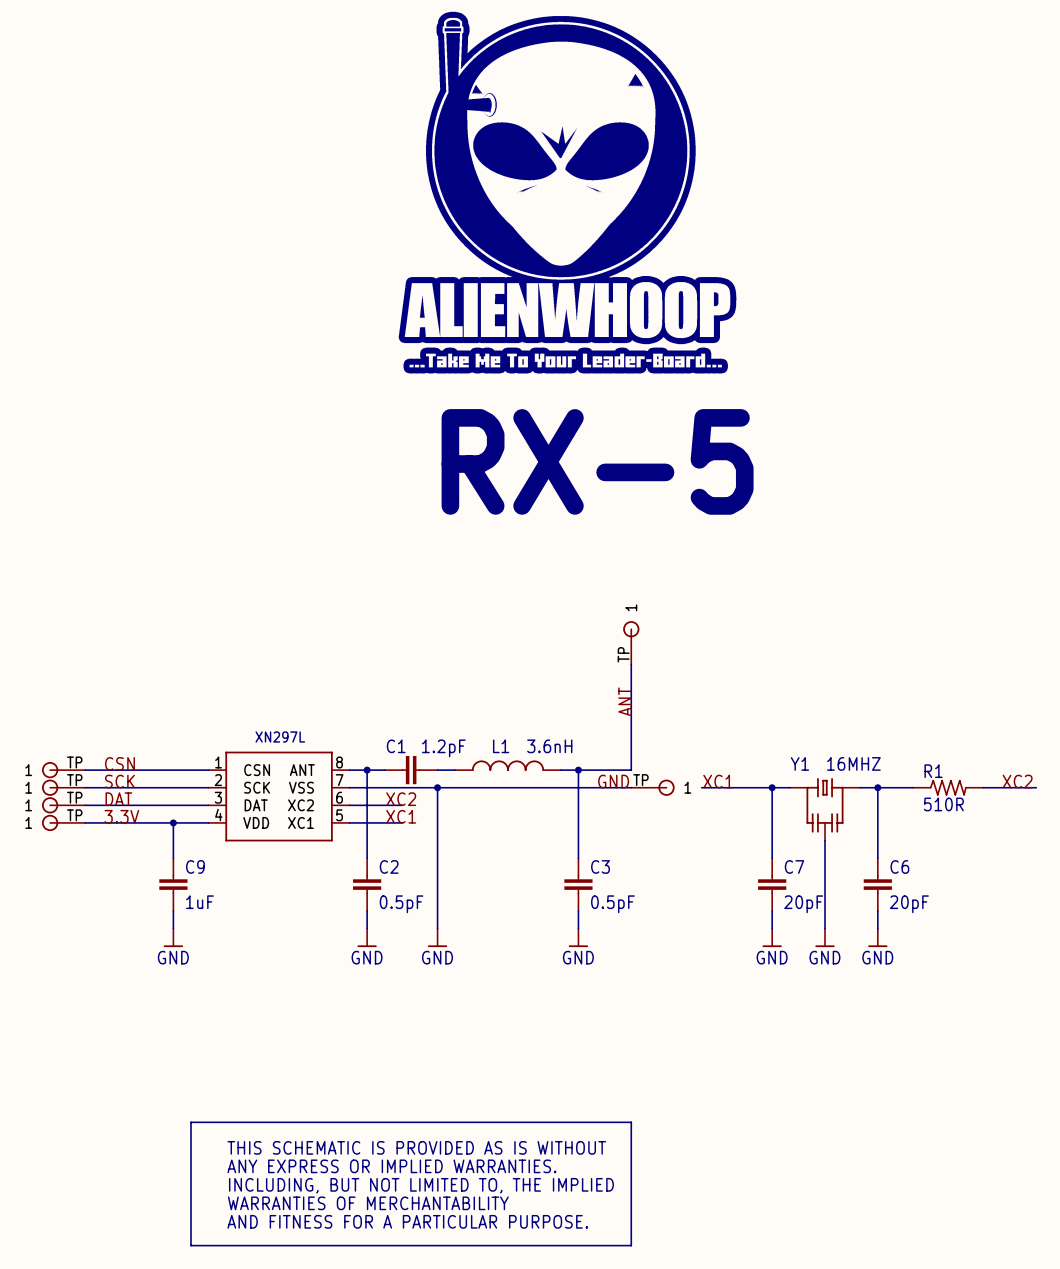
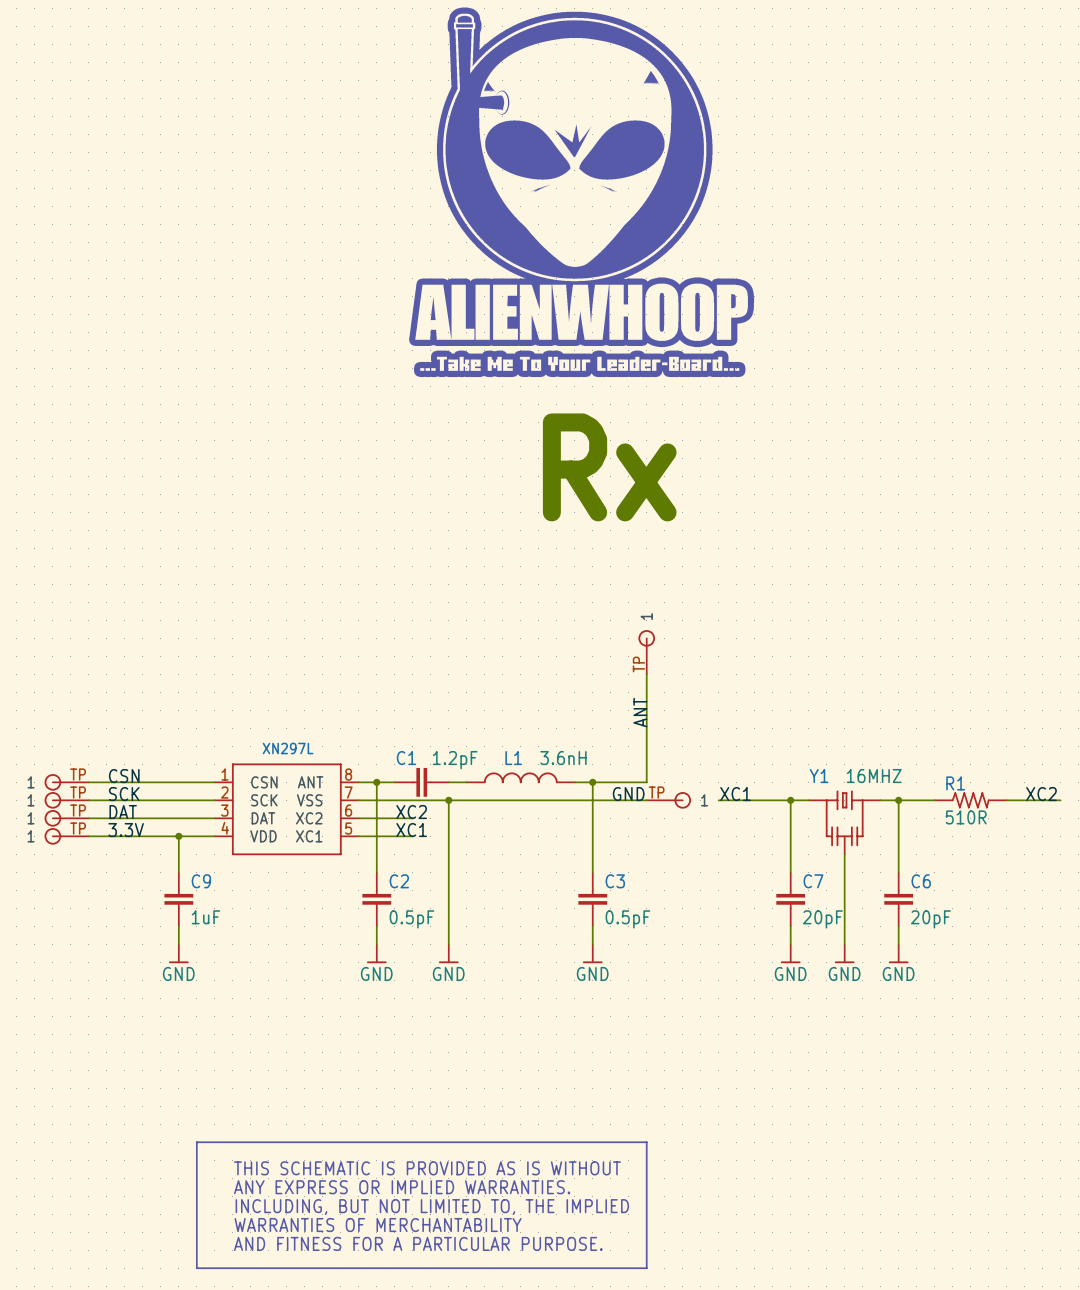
text: none -> Rx (609, 467)
text: RX-5 (597, 461) -> none

